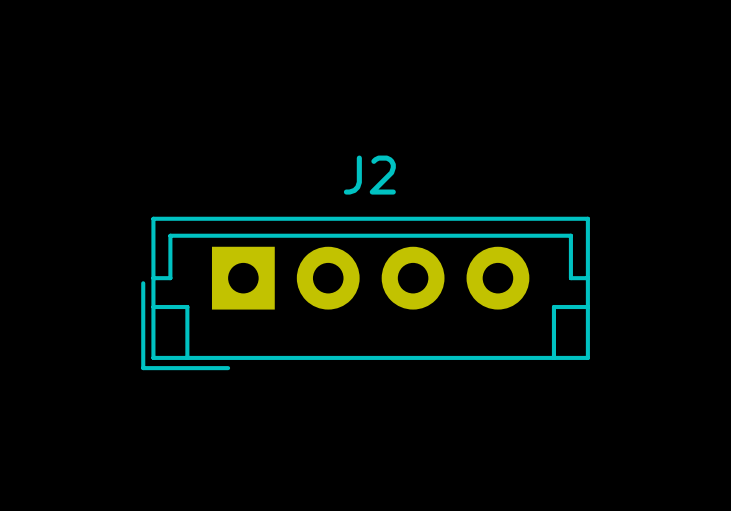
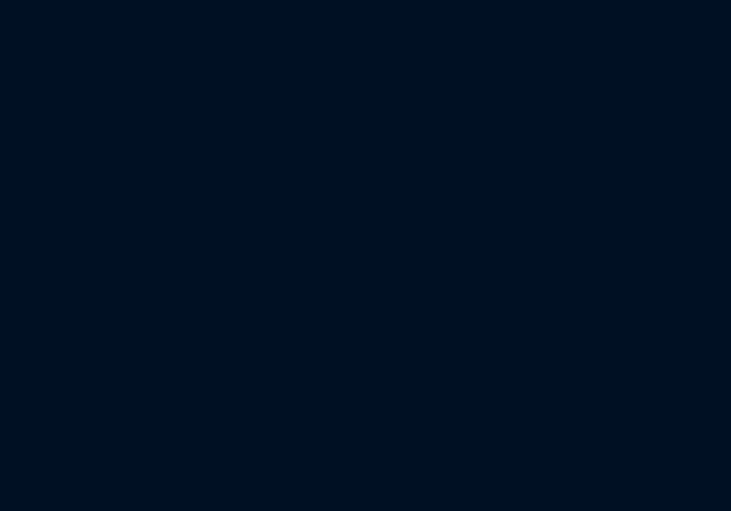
J2: (365, 293) -> none

